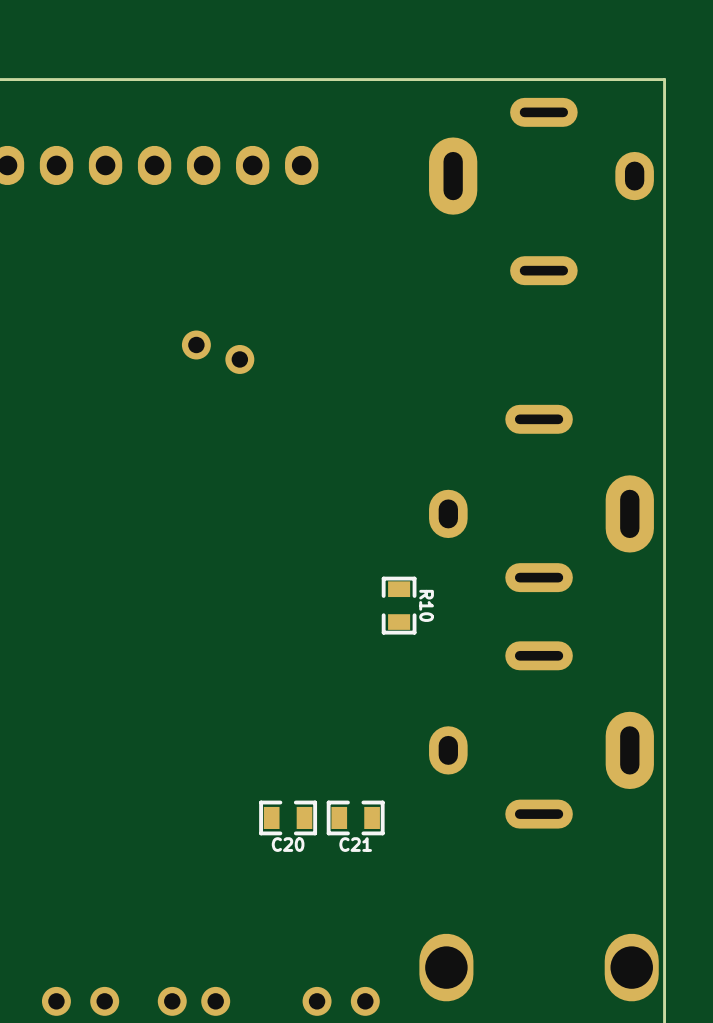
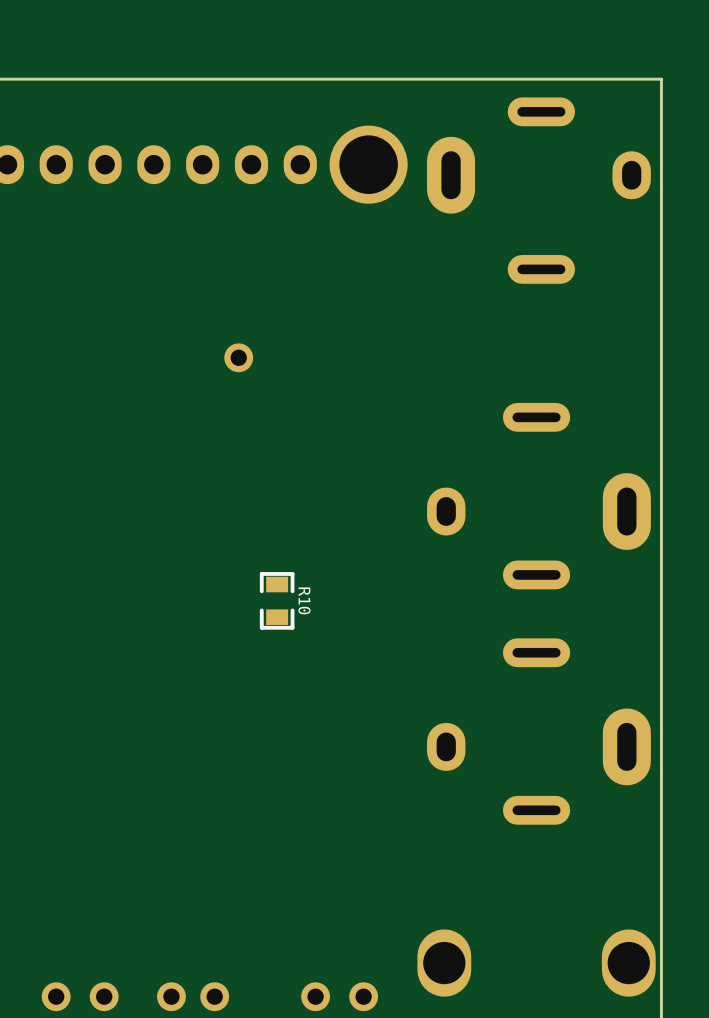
part: none -> (368, 164)
part: (196, 344) -> none
R10 position: (399, 605) -> (277, 600)
C20: (288, 817) -> none
C21: (355, 817) -> none

